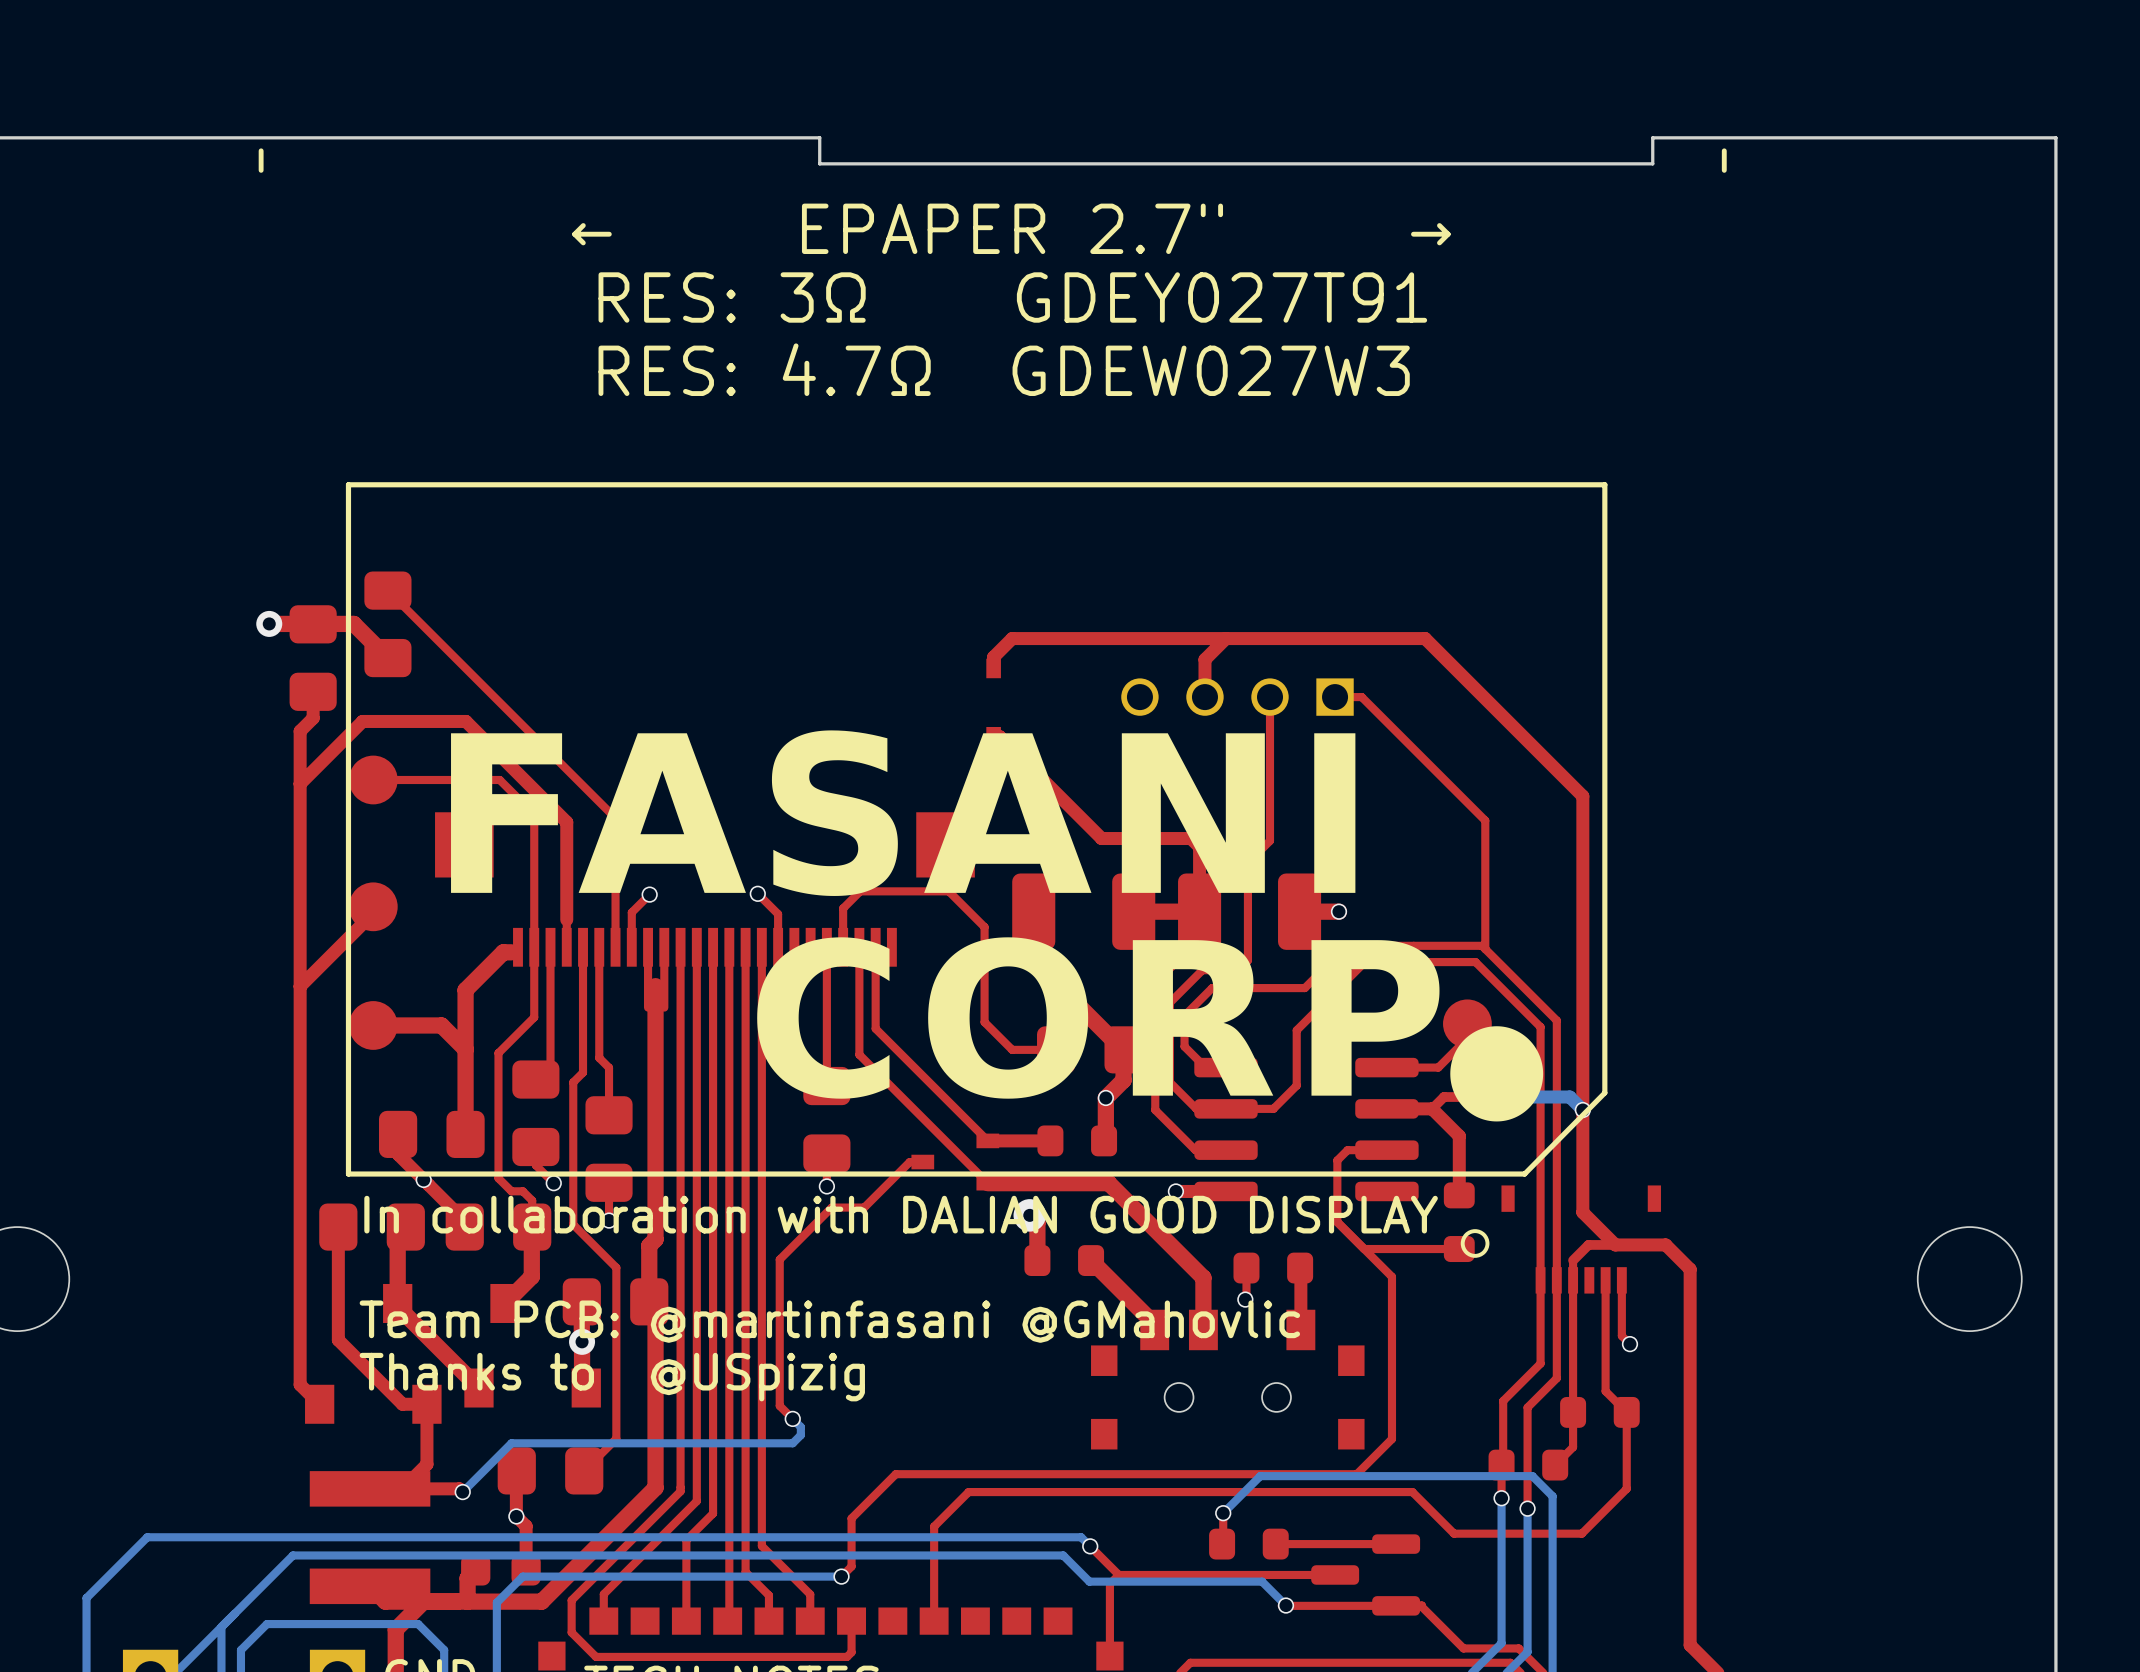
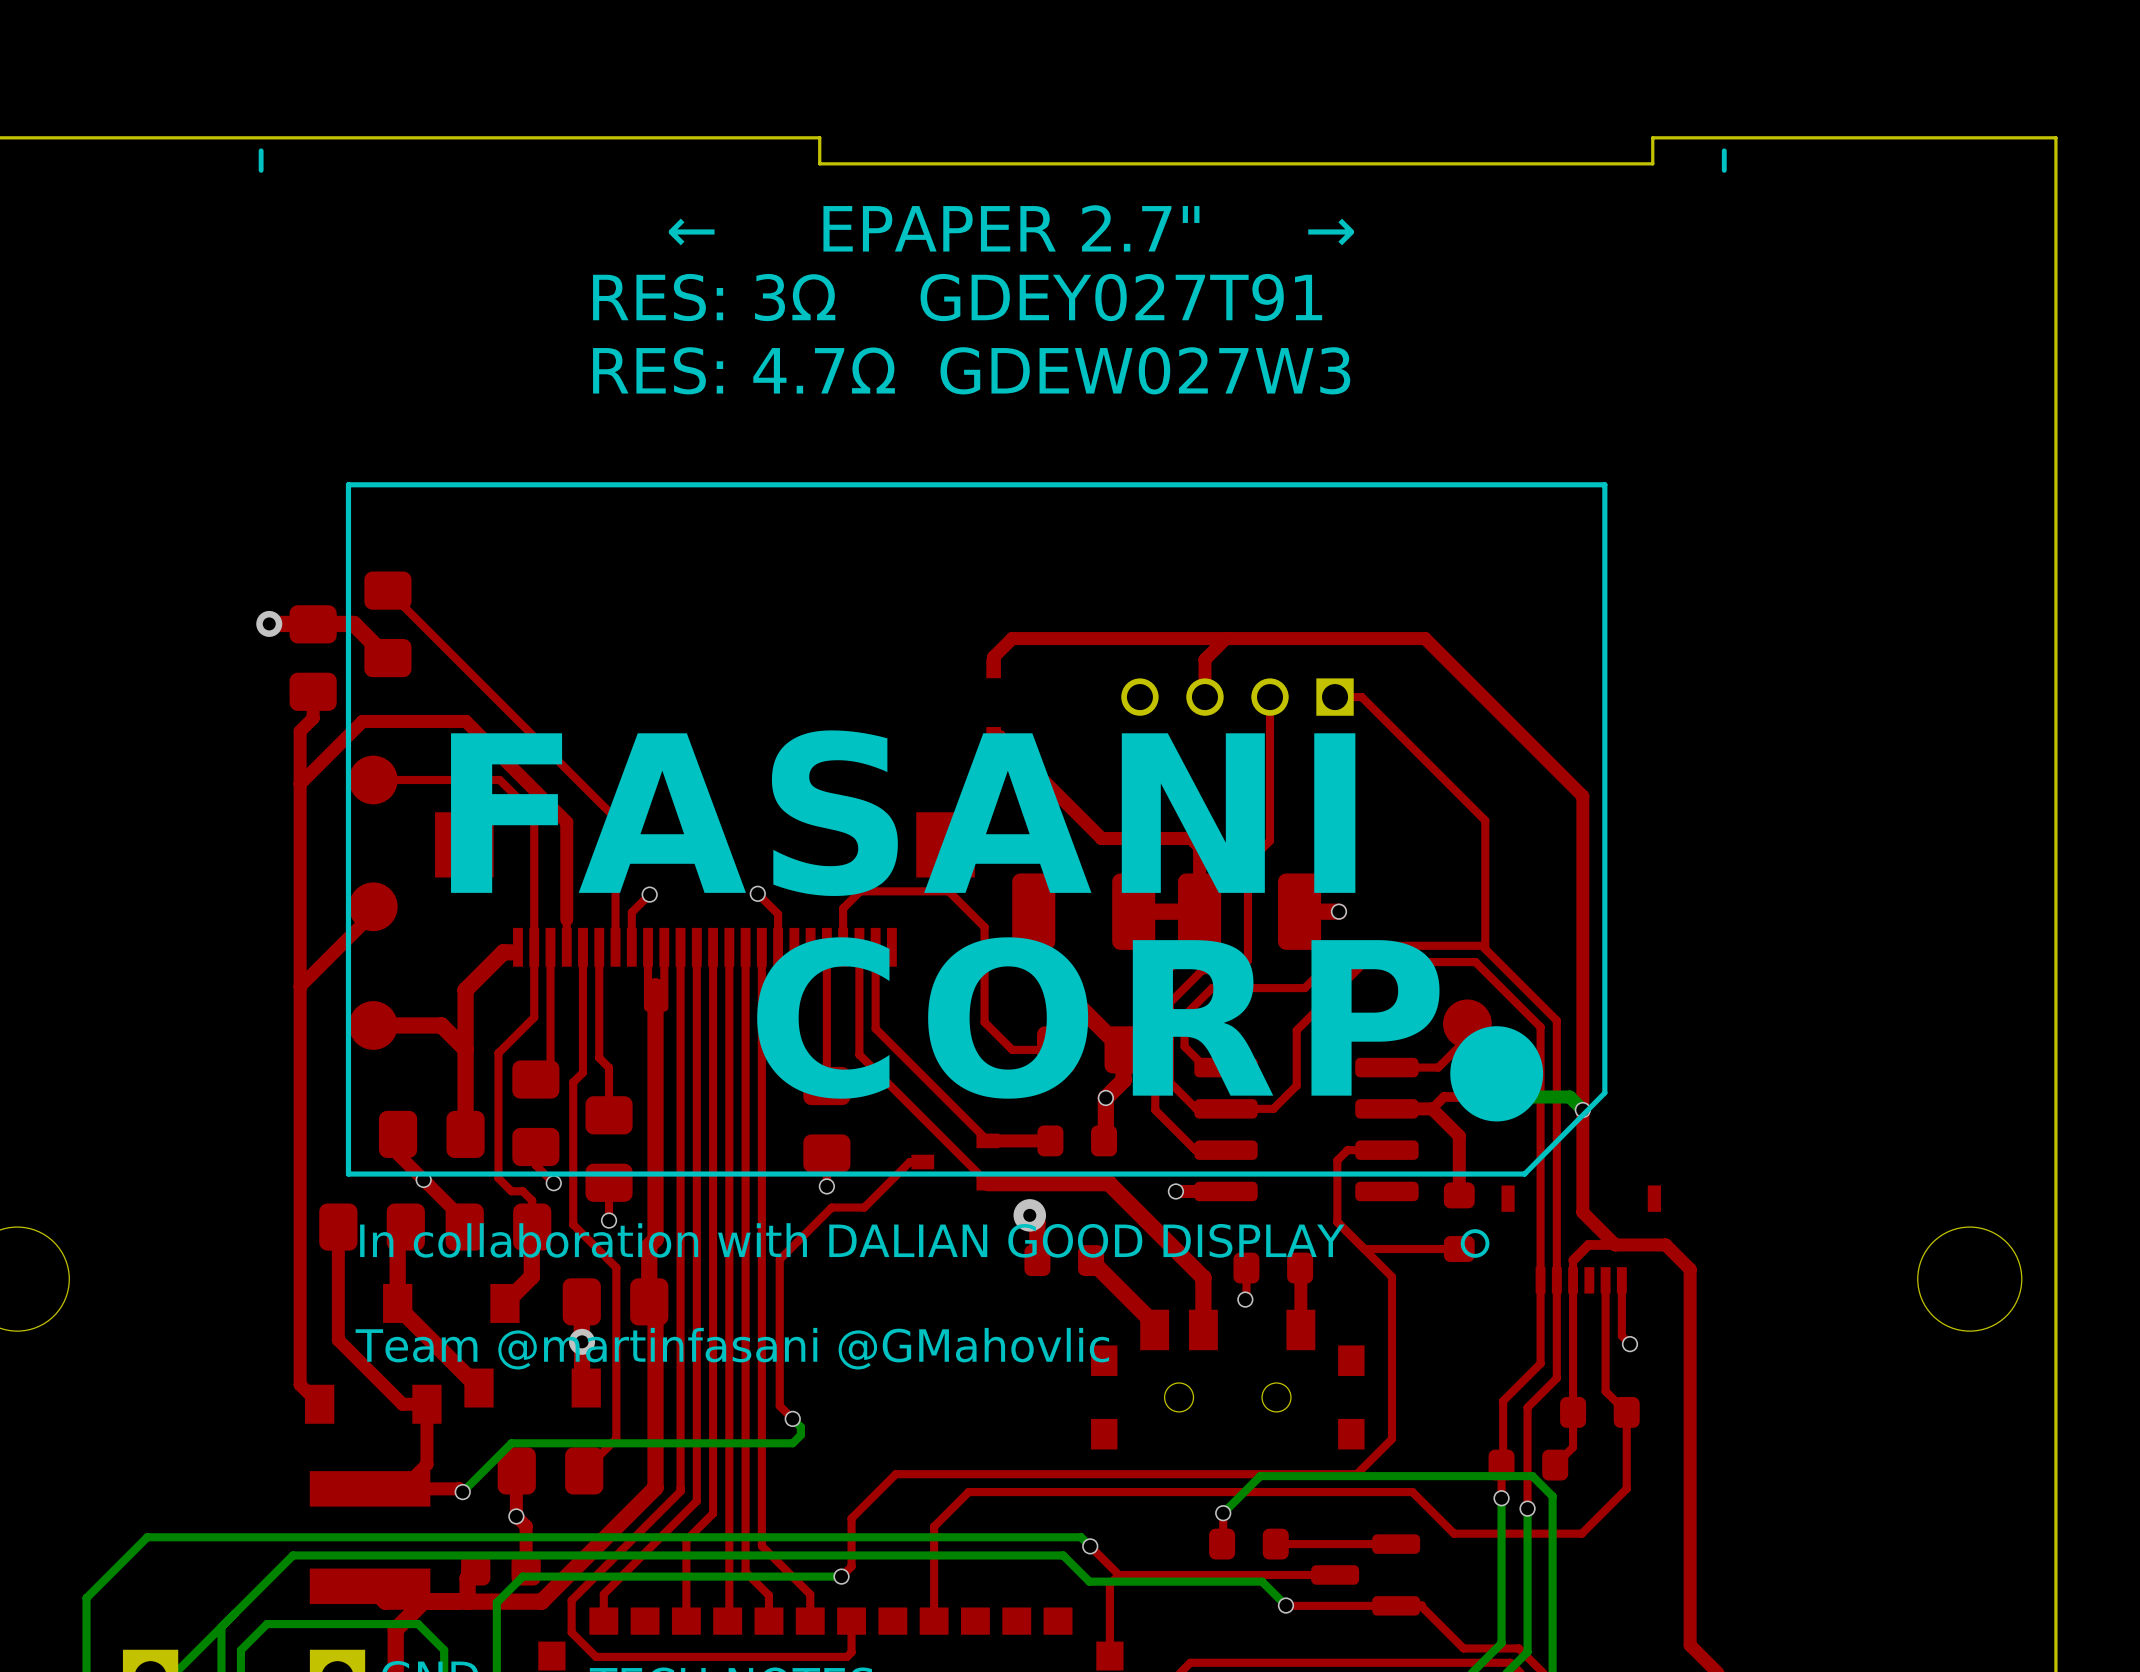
text position: In collaboration with DALIAN GOOD DISPLAY (901, 1214) -> In collaboration with DALIAN GOOD DISPLAY (852, 1240)
text: Team PCB: @martinfasani @GMahovlic (829, 1321) -> Team @martinfasani @GMahovlic (732, 1348)
text: Thanks to @USpizig (612, 1377) -> none

